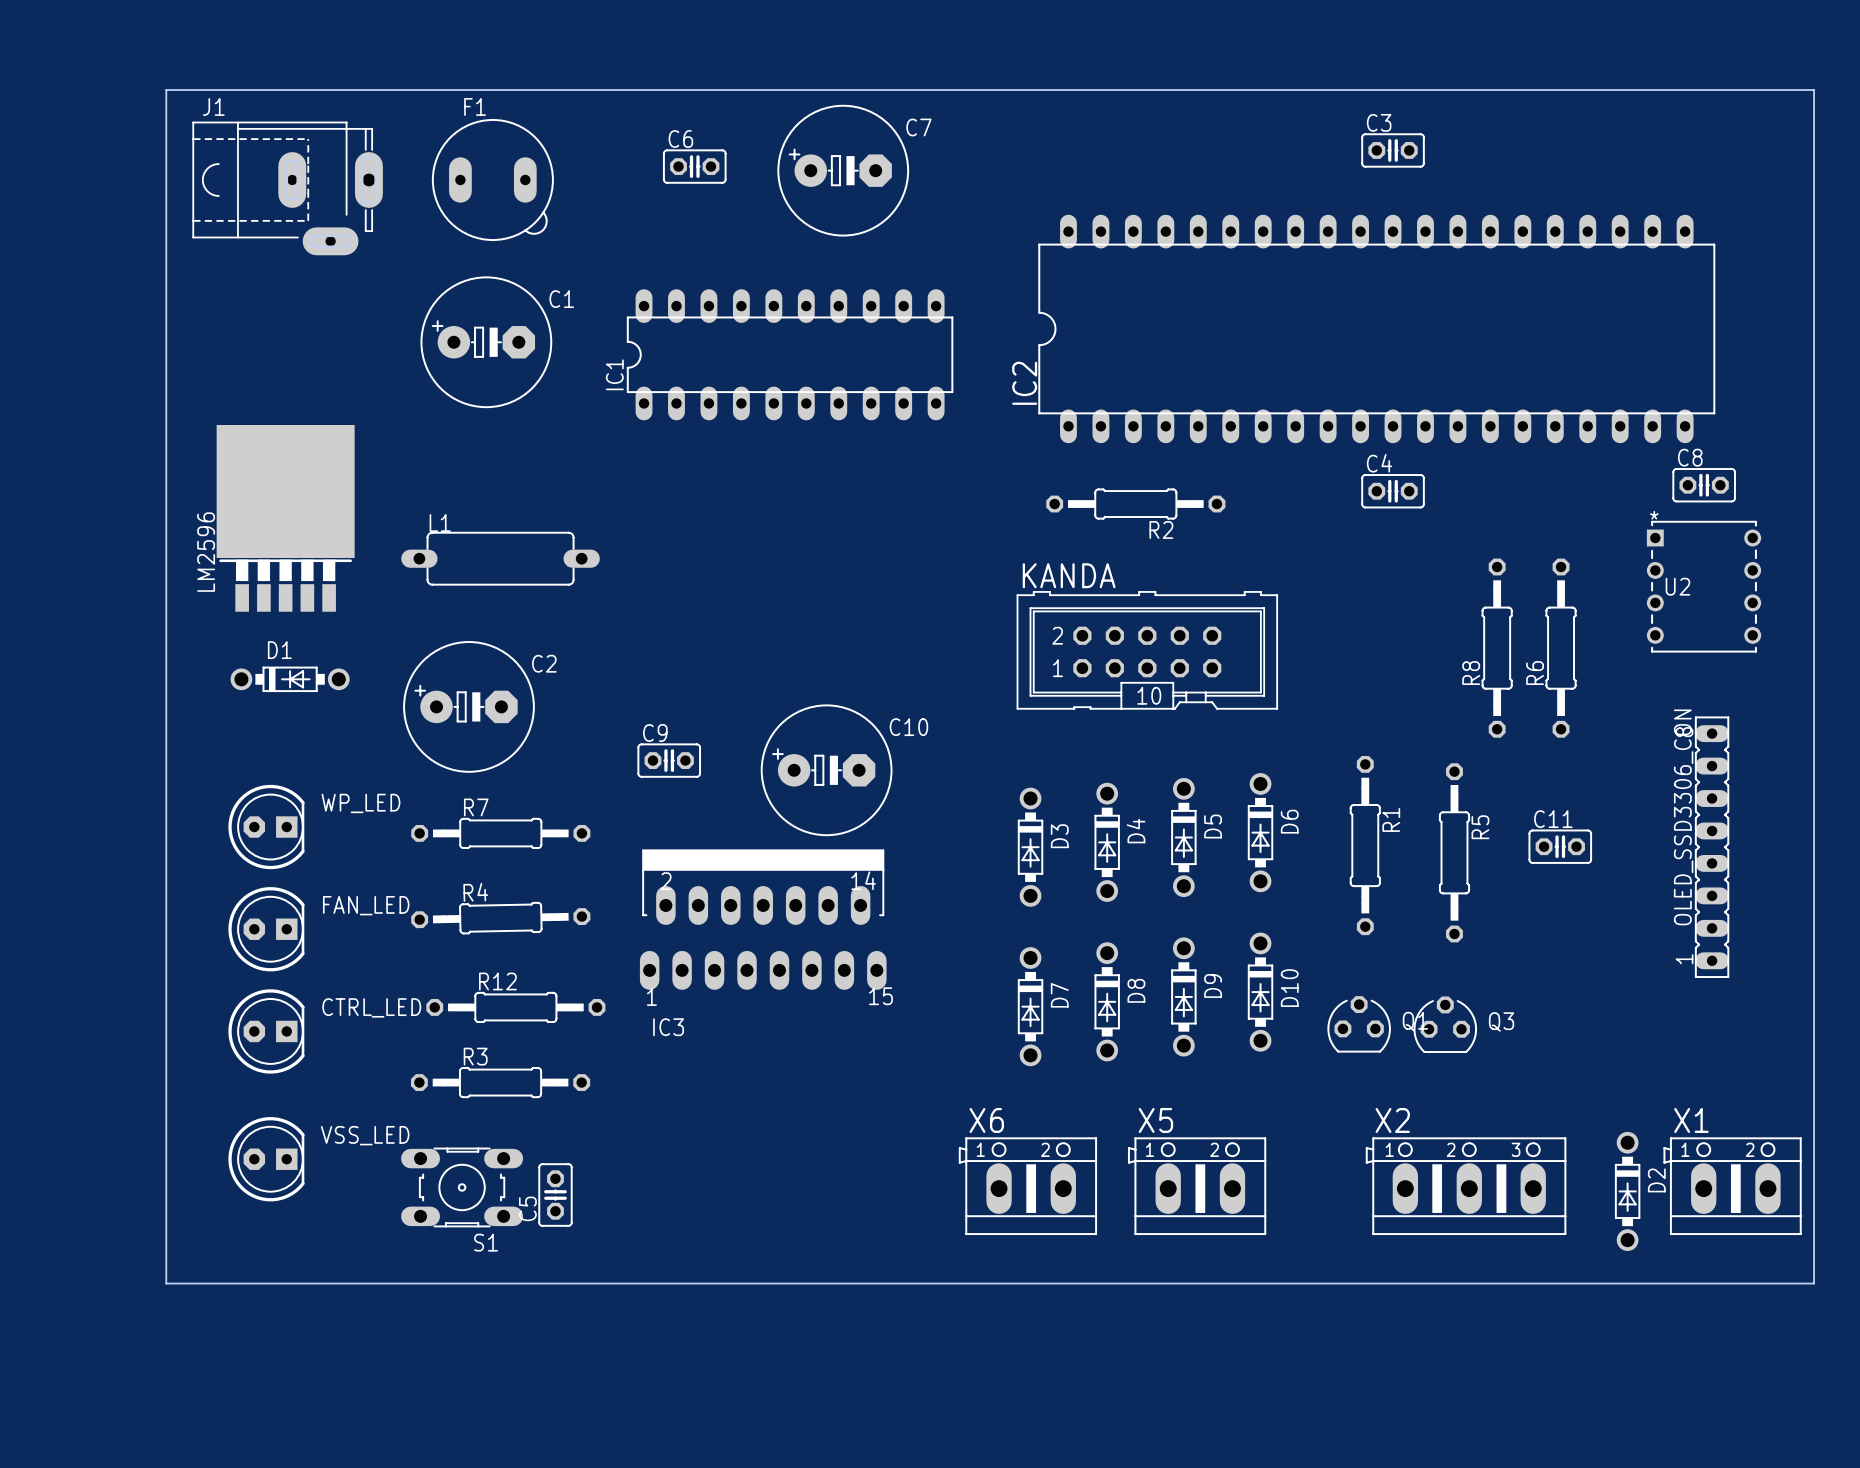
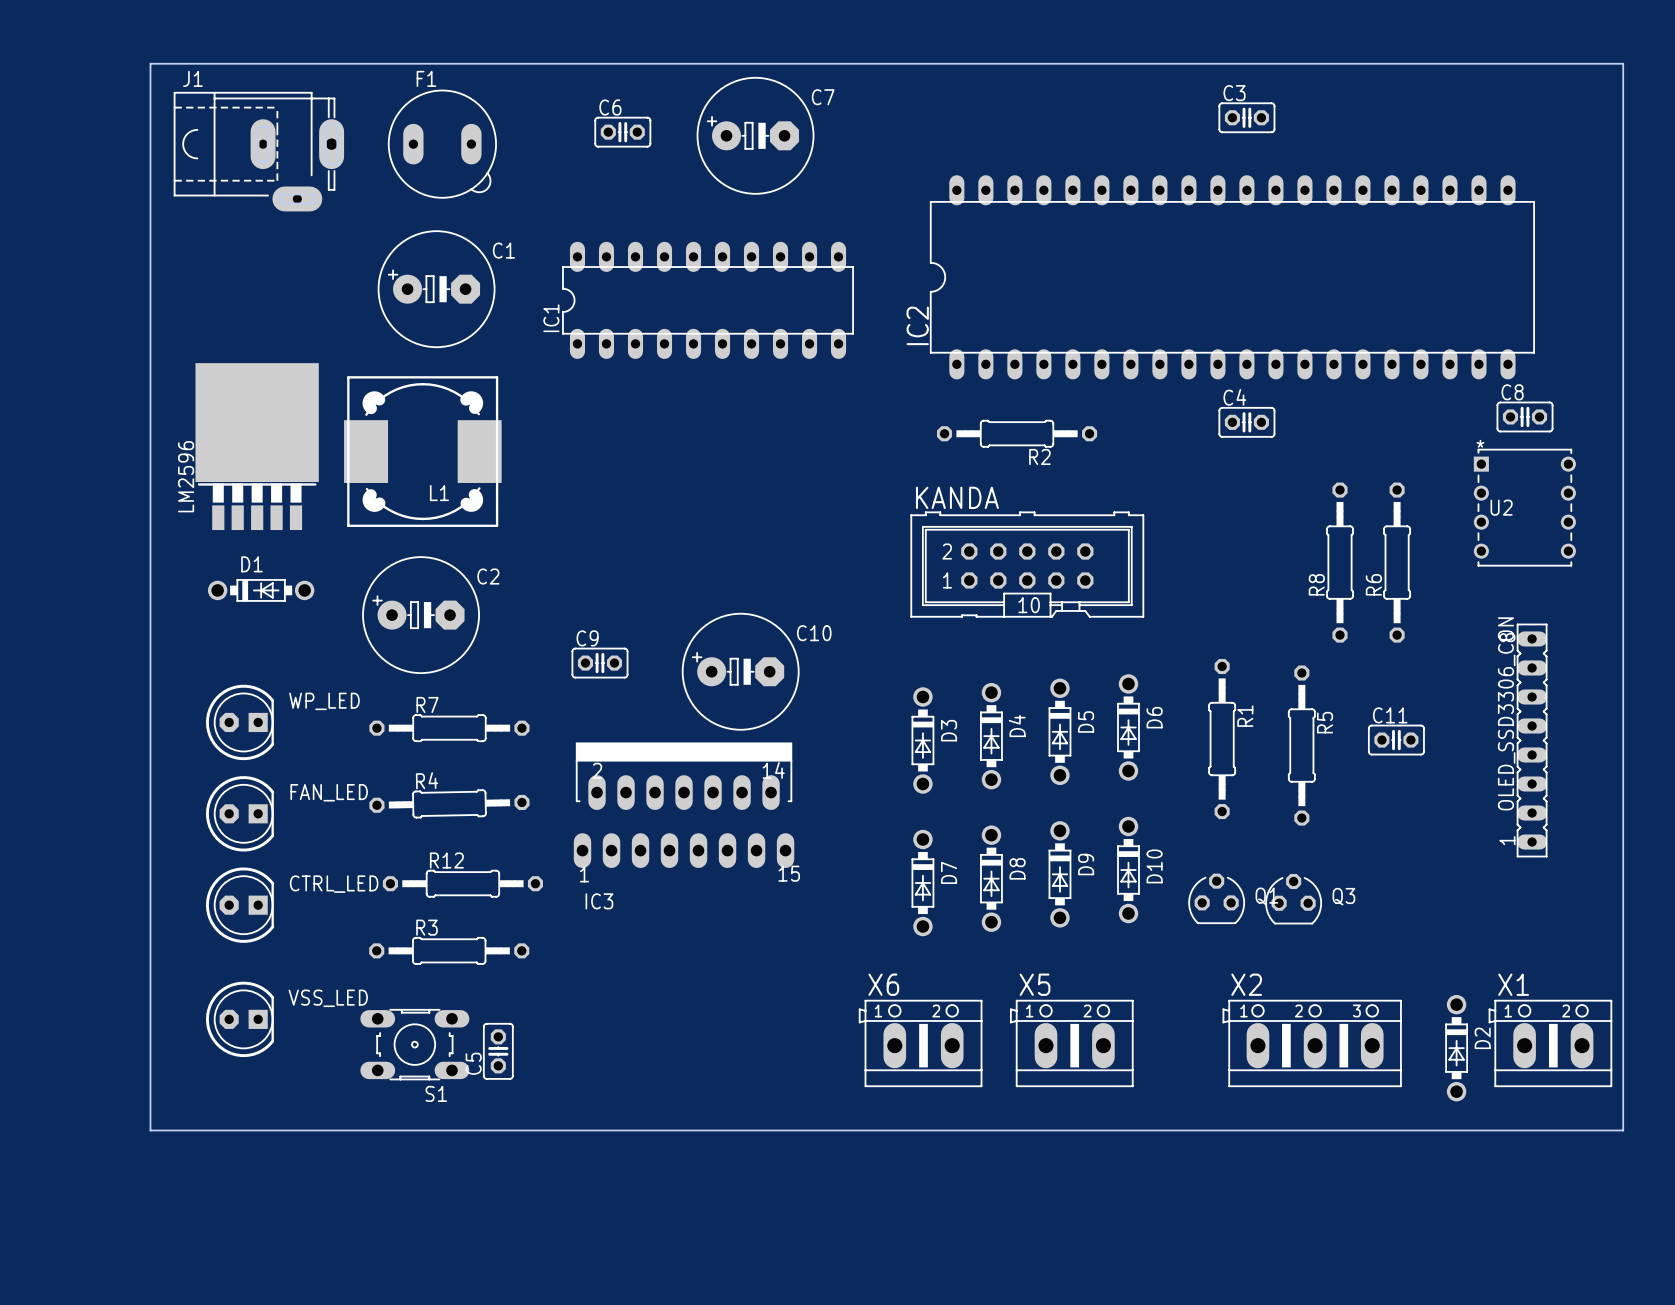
L1 name position: L1 (440, 523) -> L1 (439, 493)
L1 footprint: [401, 531, 600, 586] -> [344, 376, 502, 527]

